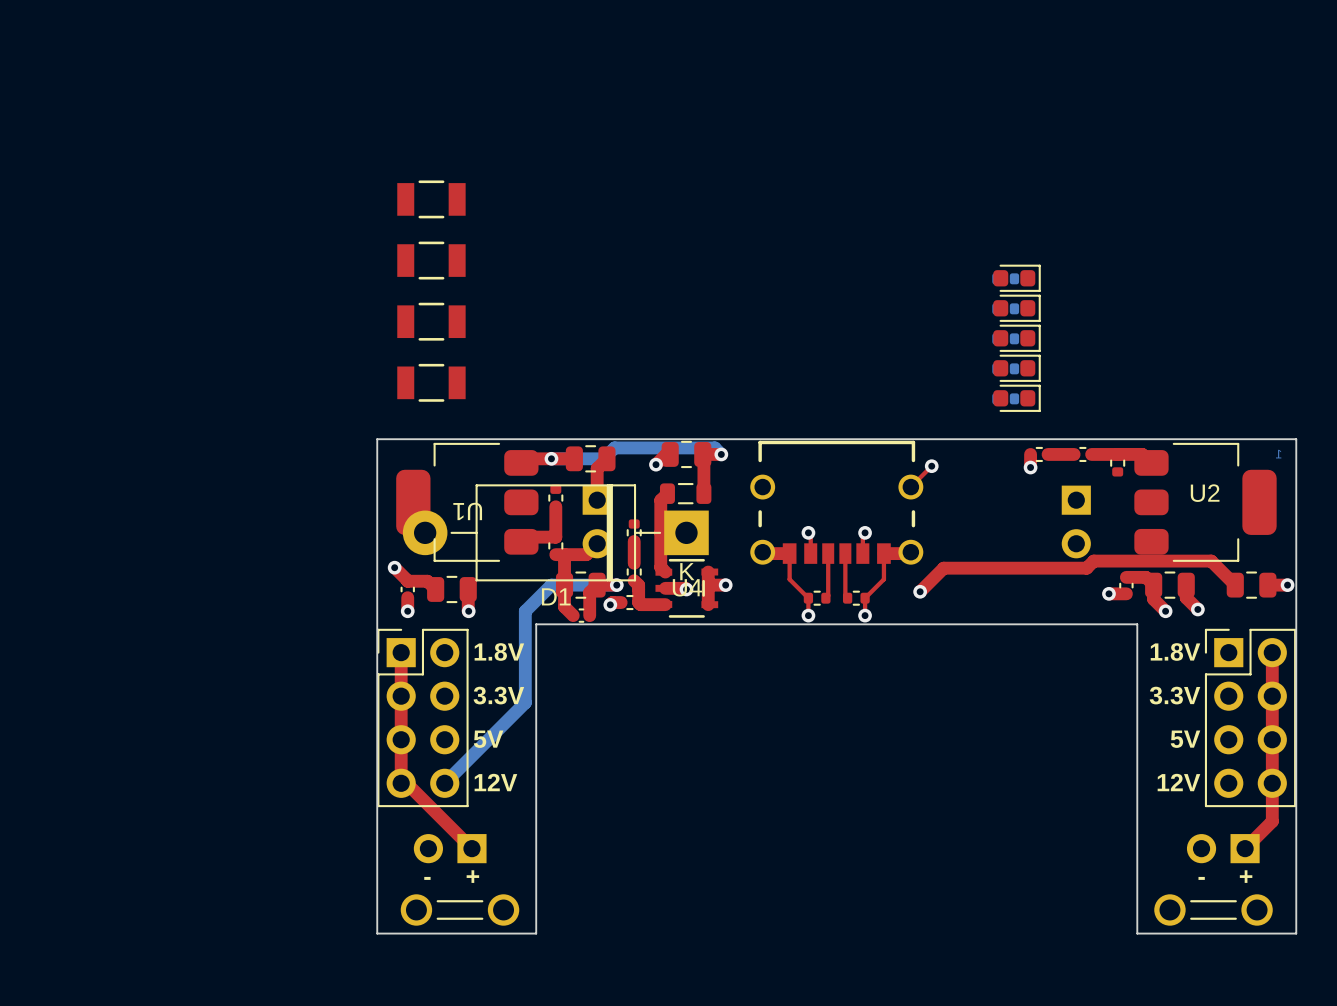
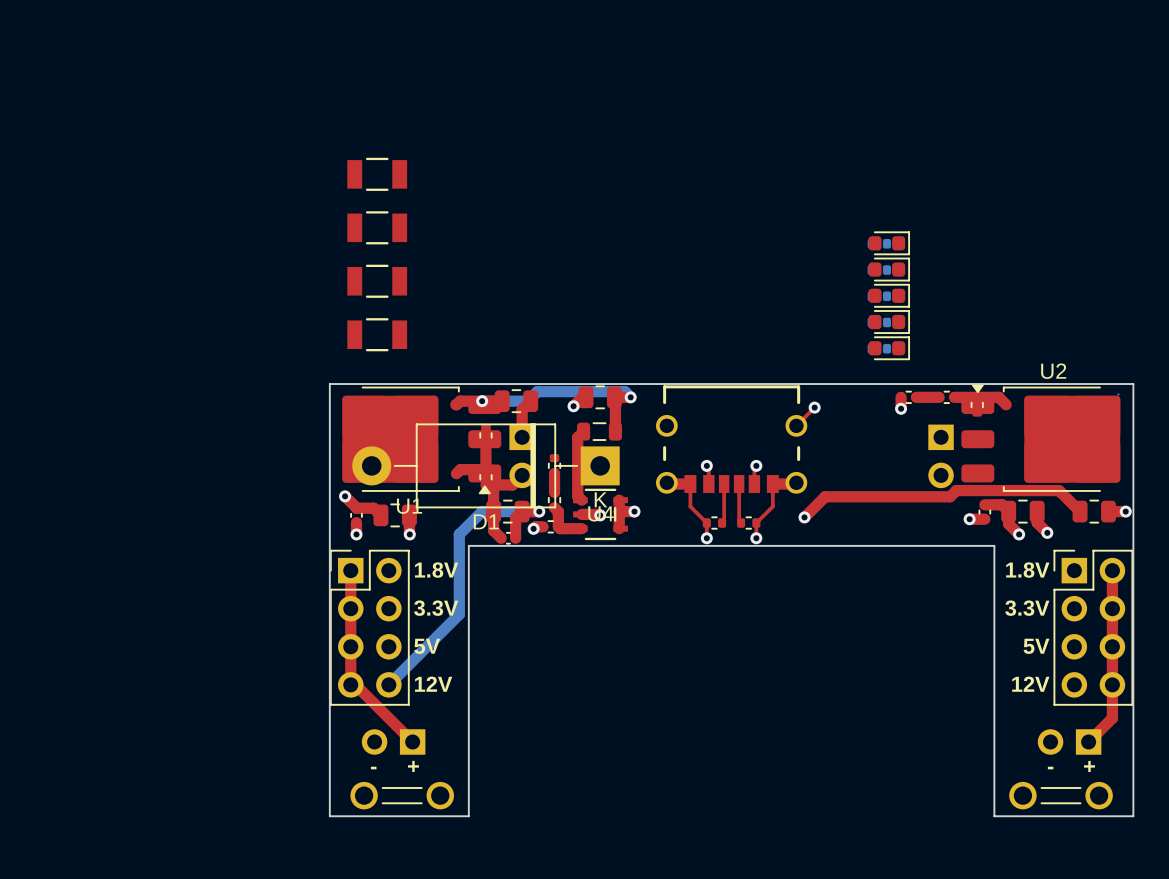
U1 footprint: [396, 442, 539, 562] -> [342, 386, 502, 495]
U2 footprint: [1134, 442, 1277, 562] -> [961, 384, 1121, 492]
U2 name position: U2 (1205, 493) -> U2 (1053, 371)
U1 name position: U1 (467, 511) -> U1 (409, 506)

